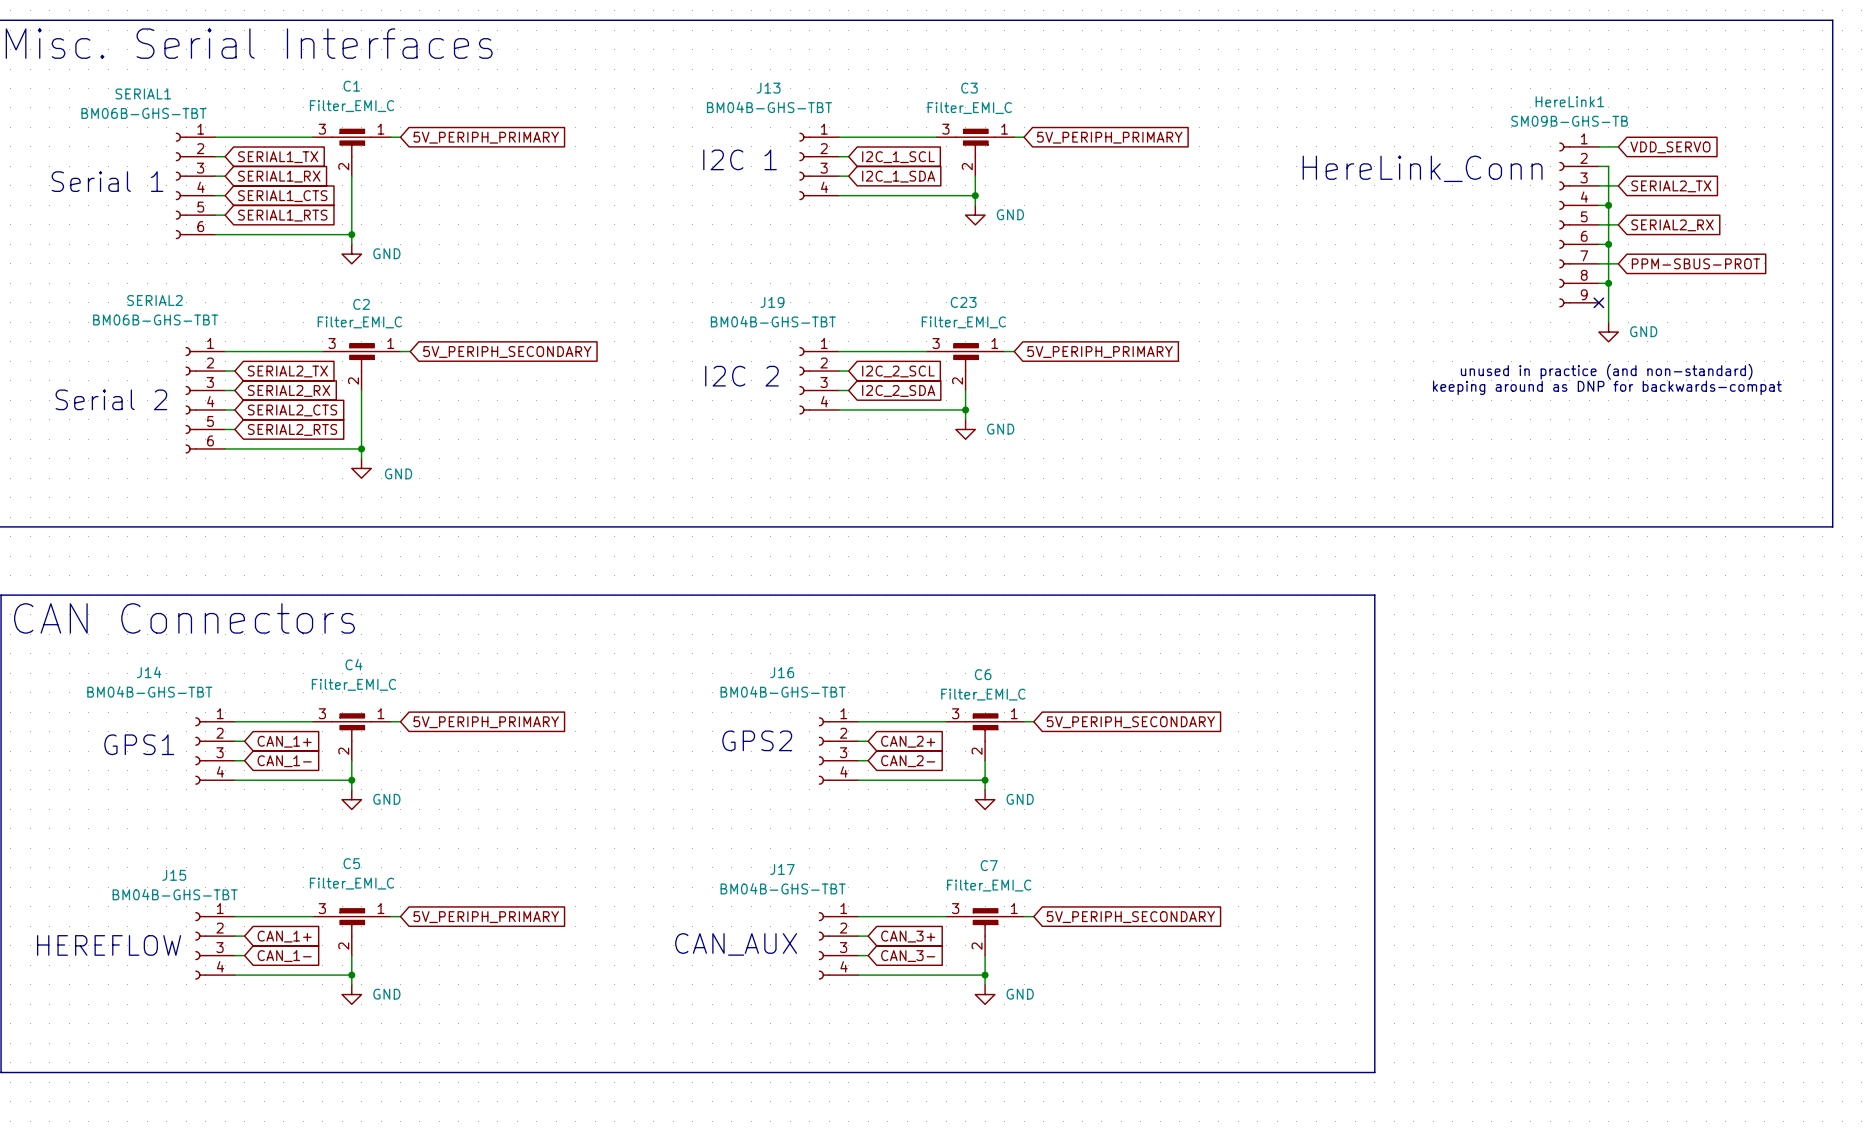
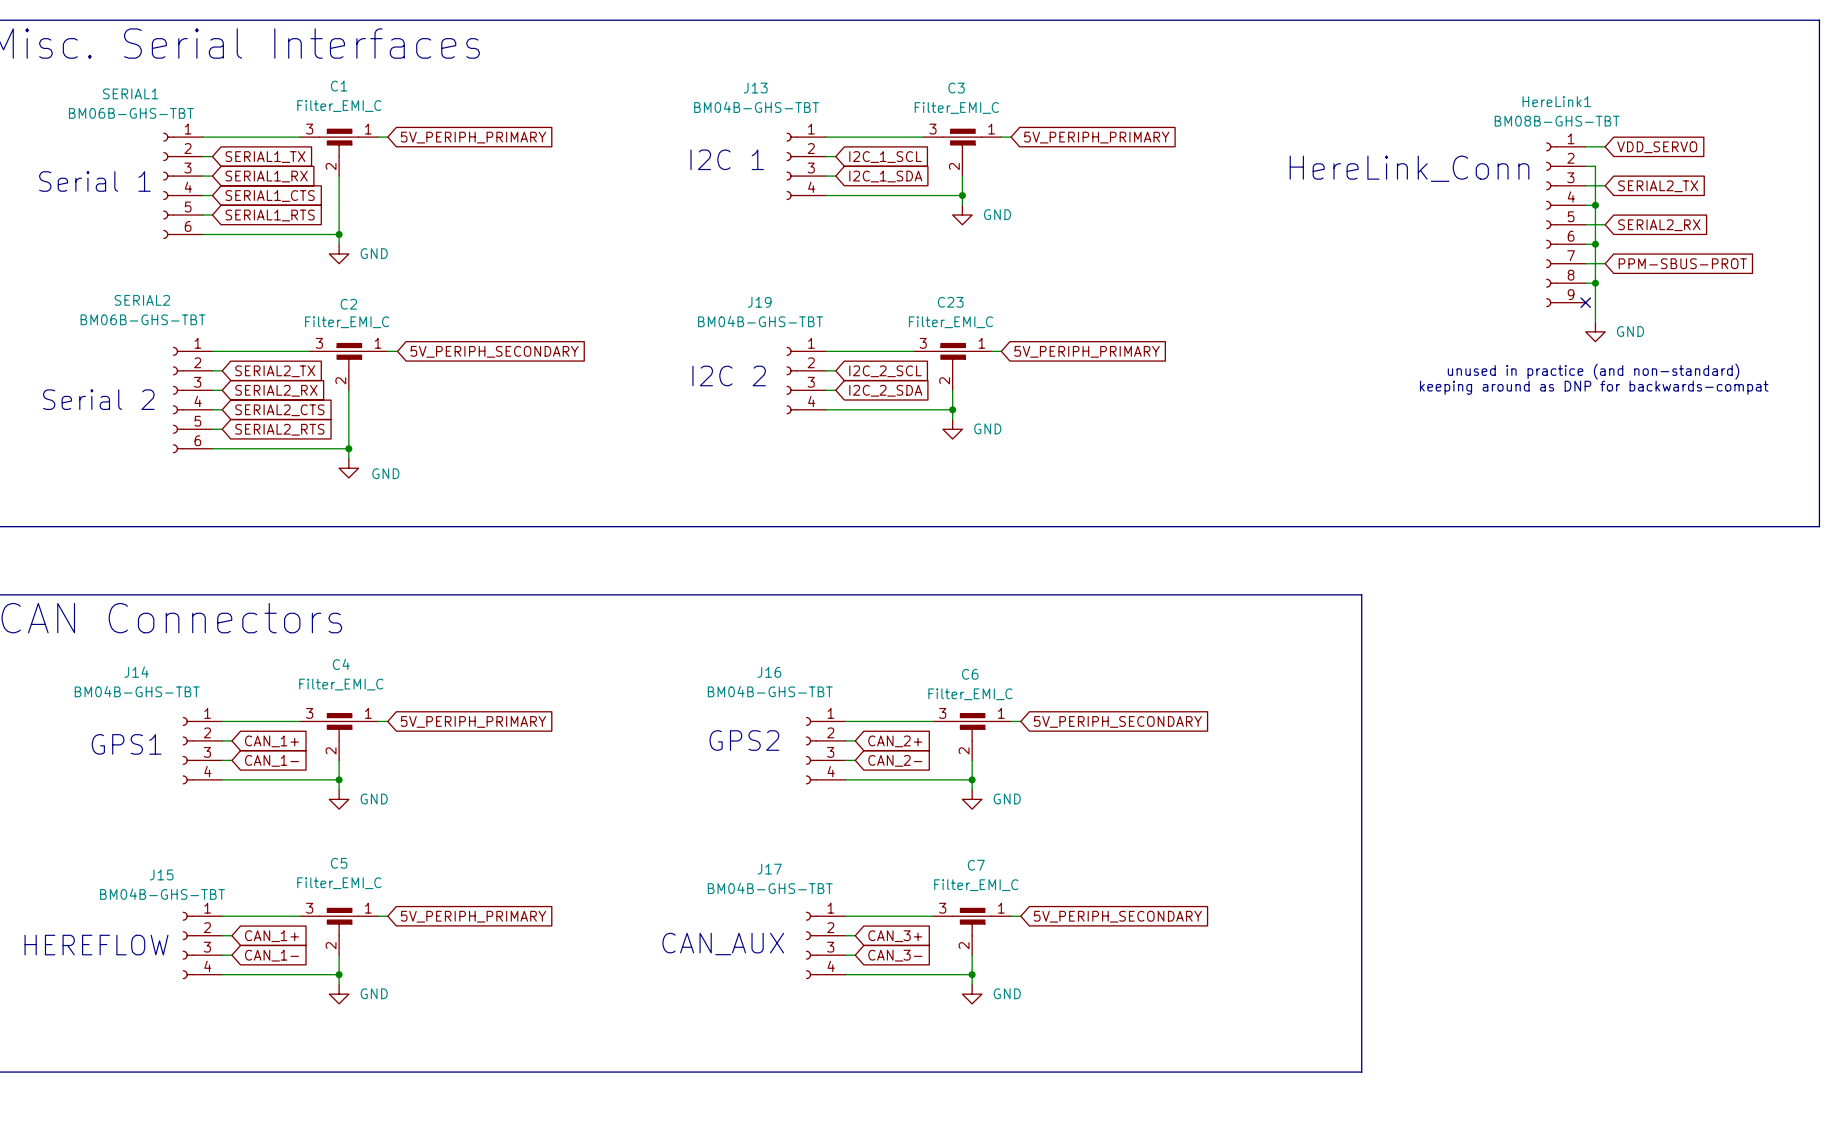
HereLink1 value: SM09B-GHS-TB (1569, 121) -> BM08B-GHS-TBT (1557, 121)

